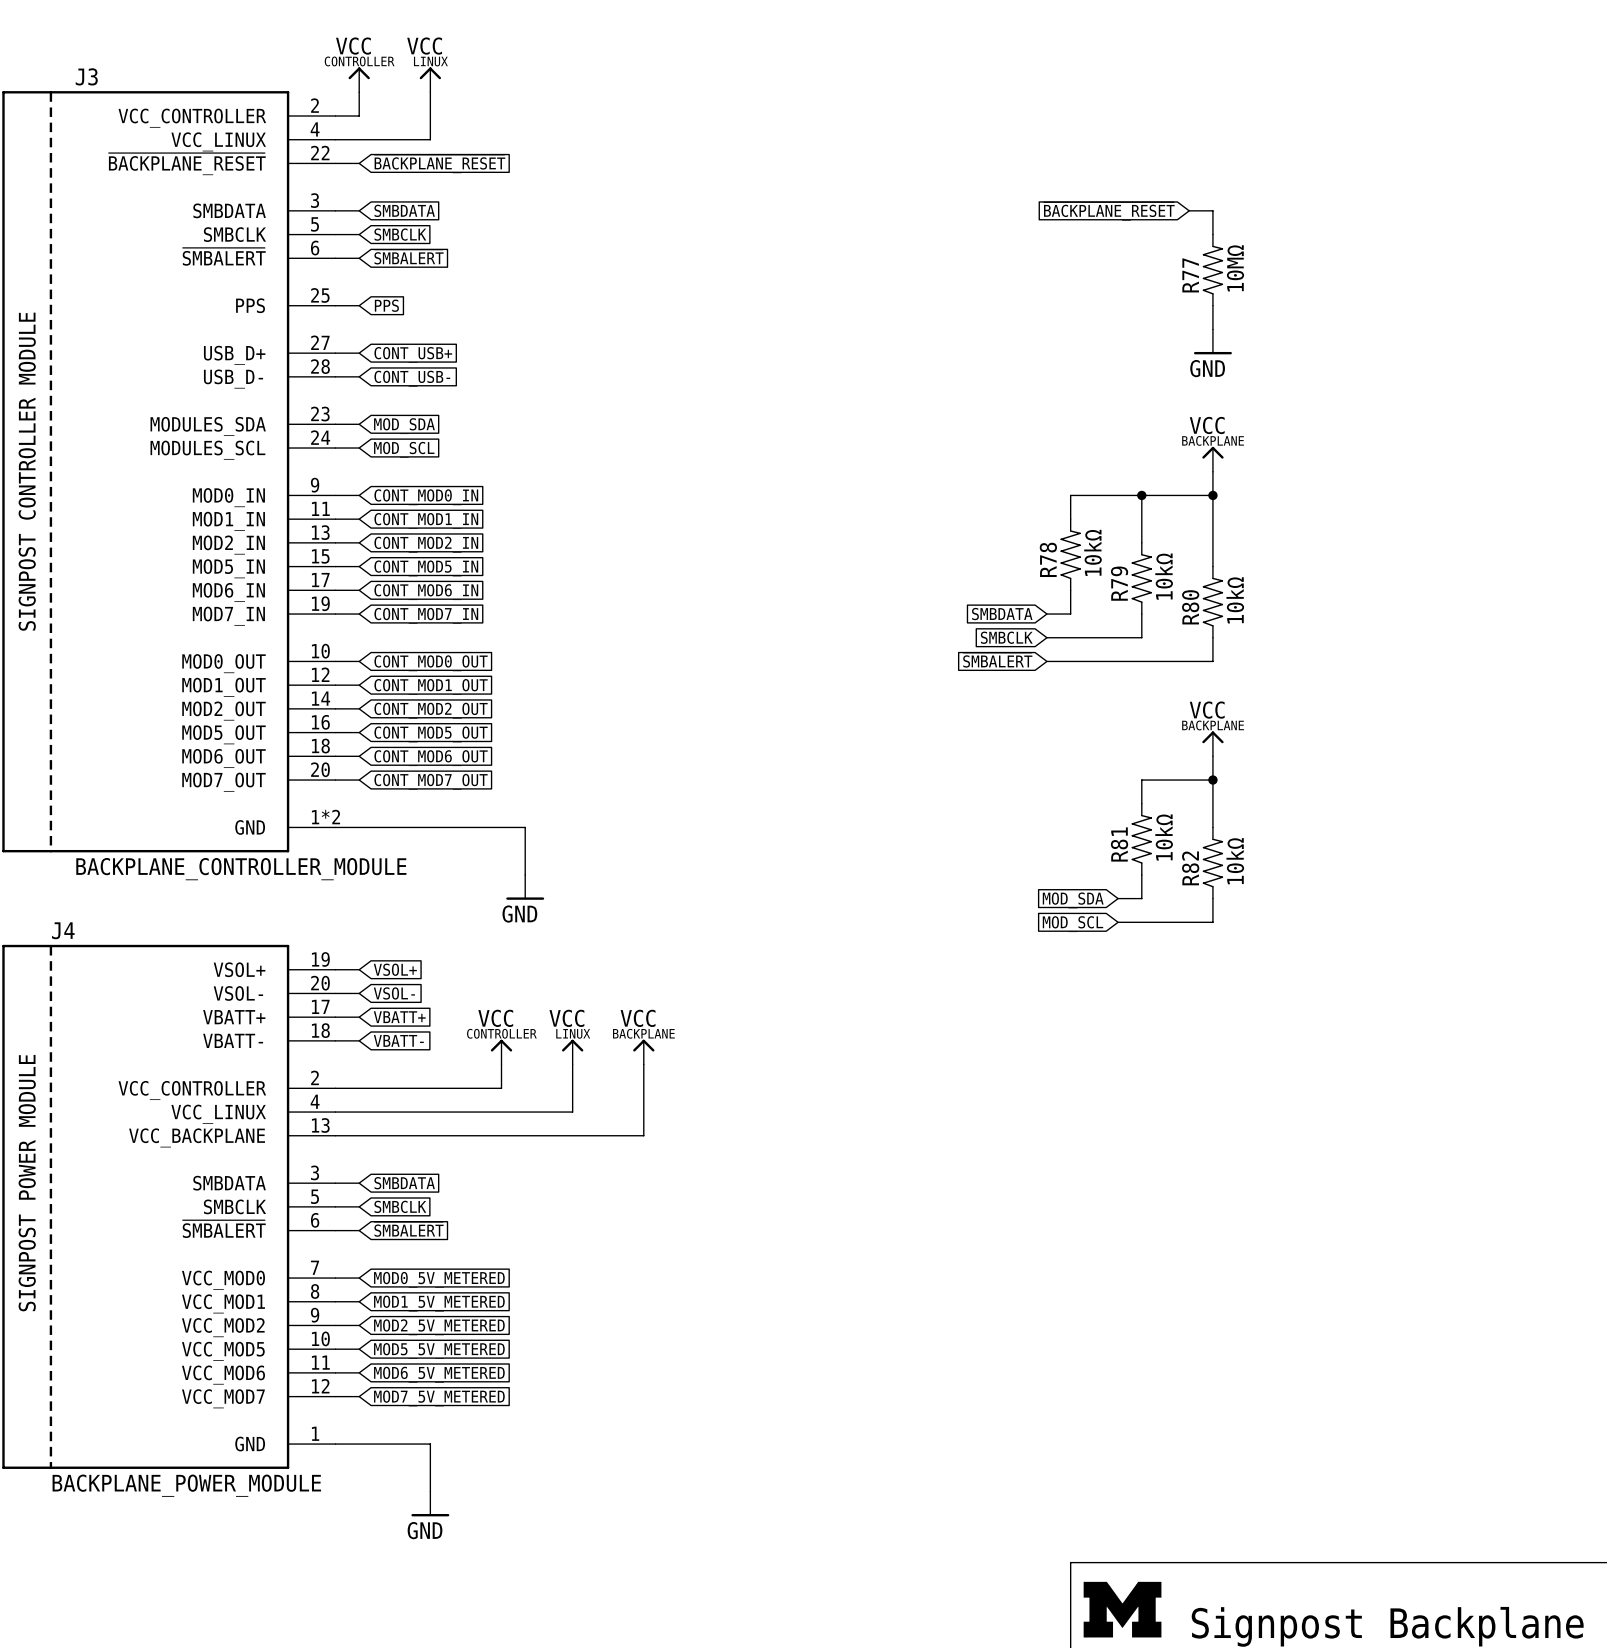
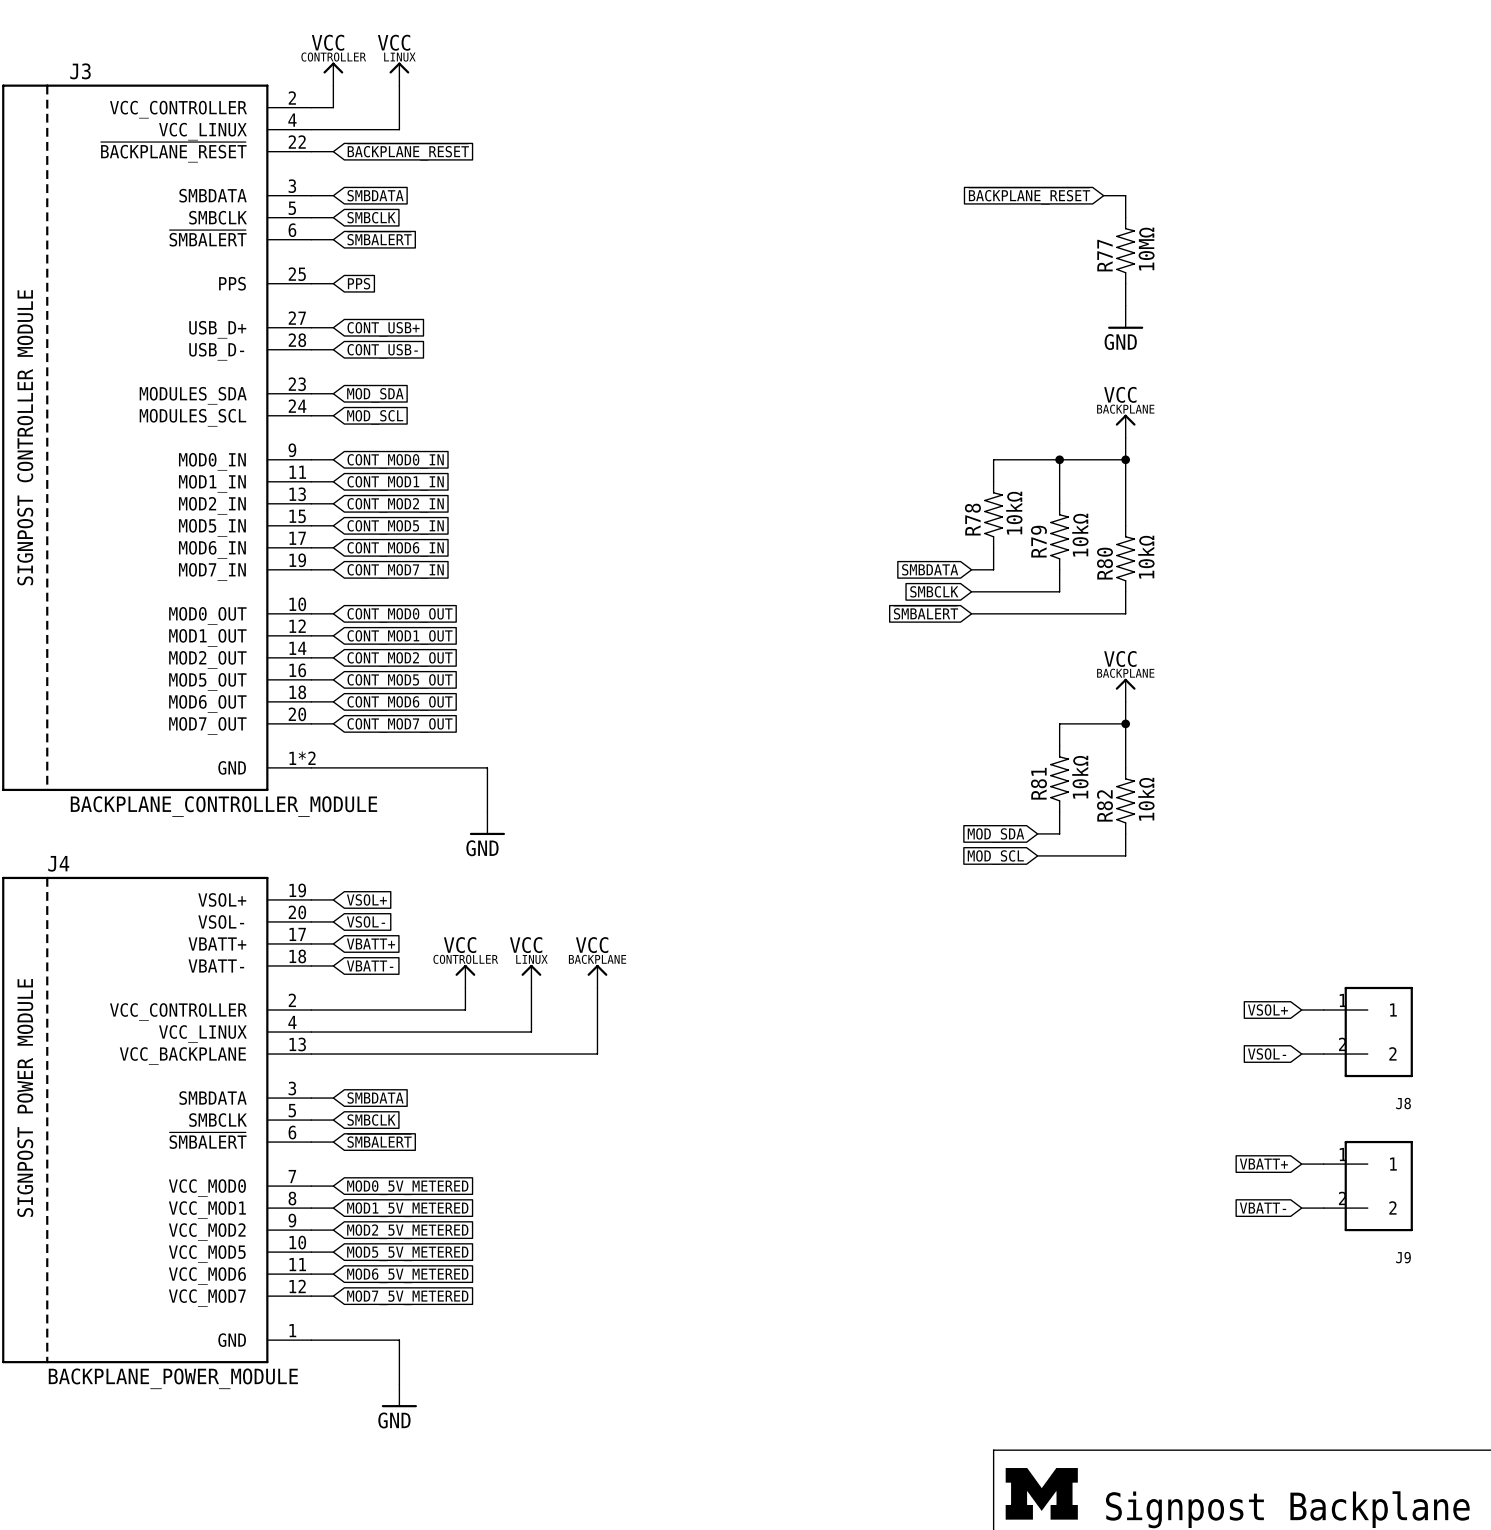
global label: none -> VSOL+ (1267, 1010)
wire: none -> (1301, 1010) (1323, 1010)
J8: none -> (1368, 1032)
global label: none -> VSOL- (1267, 1054)
wire: none -> (1301, 1054) (1323, 1054)
global label: none -> VBATT+ (1263, 1164)
wire: none -> (1301, 1164) (1323, 1164)
J9: none -> (1368, 1186)
global label: none -> VBATT- (1263, 1208)
wire: none -> (1301, 1208) (1323, 1208)

